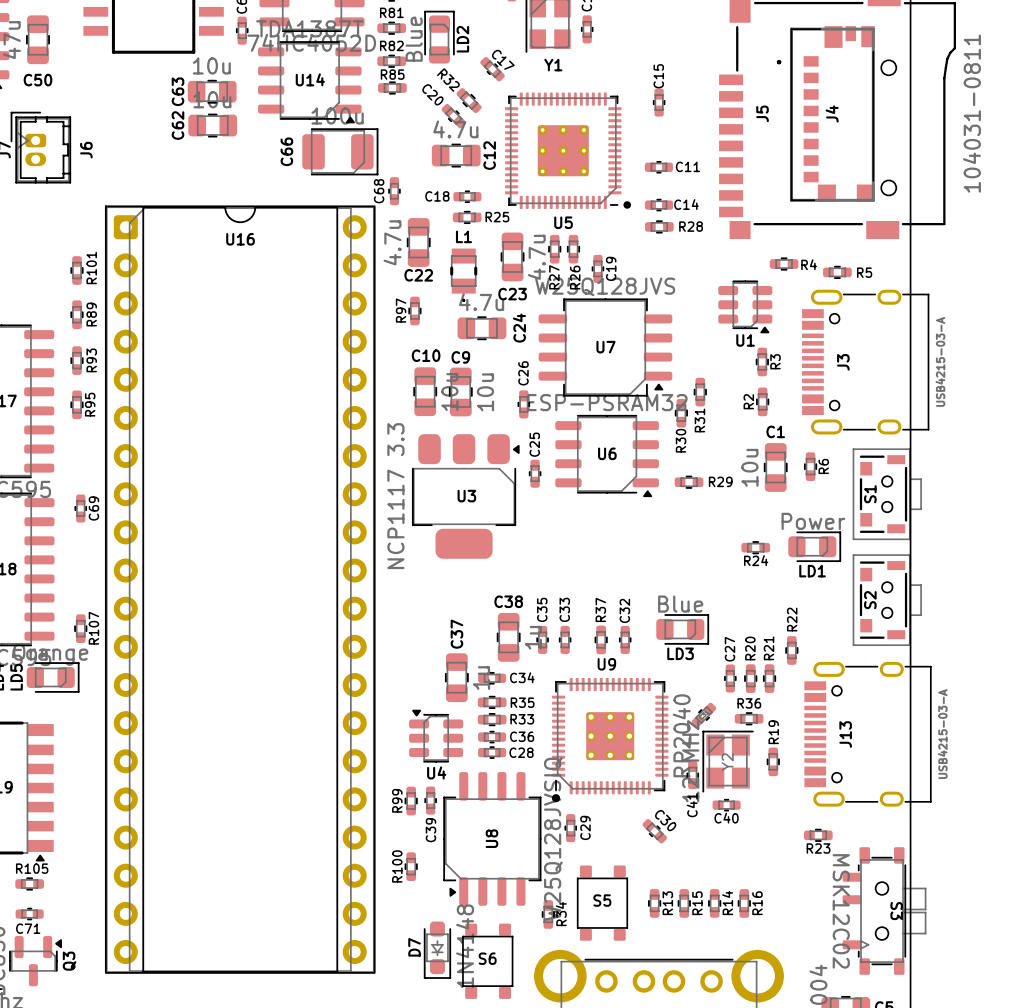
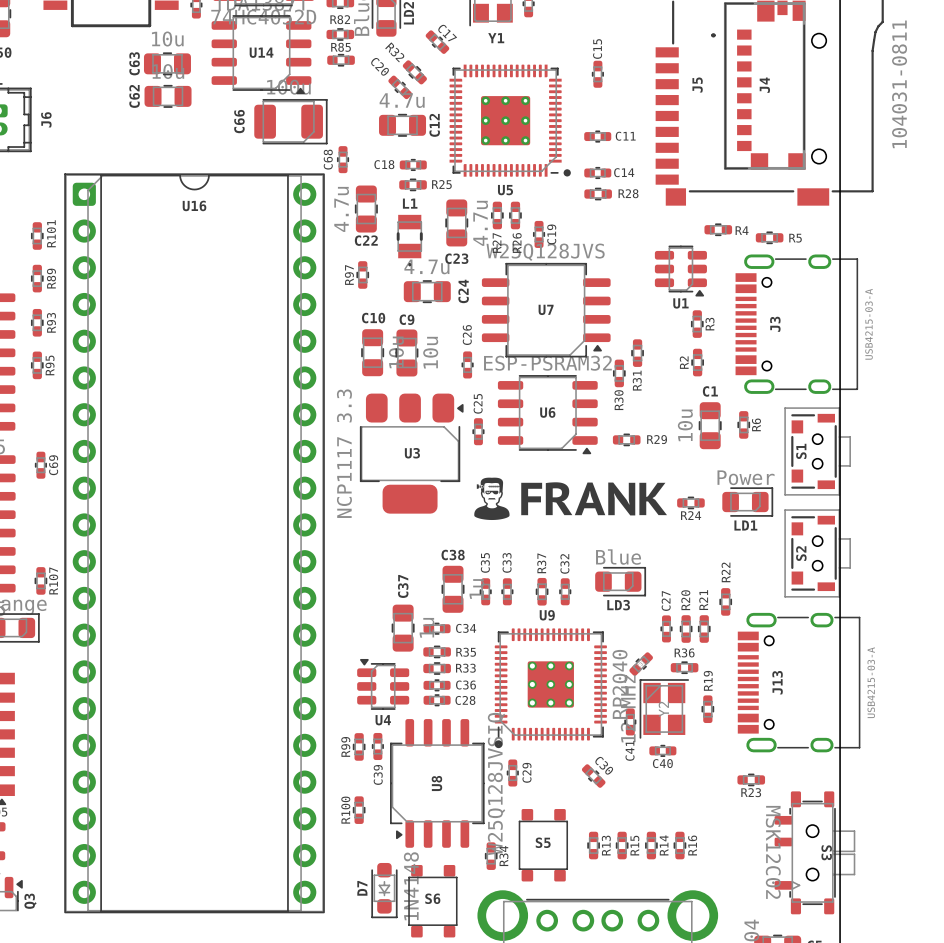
drawing: none -> [474, 477, 668, 521]

